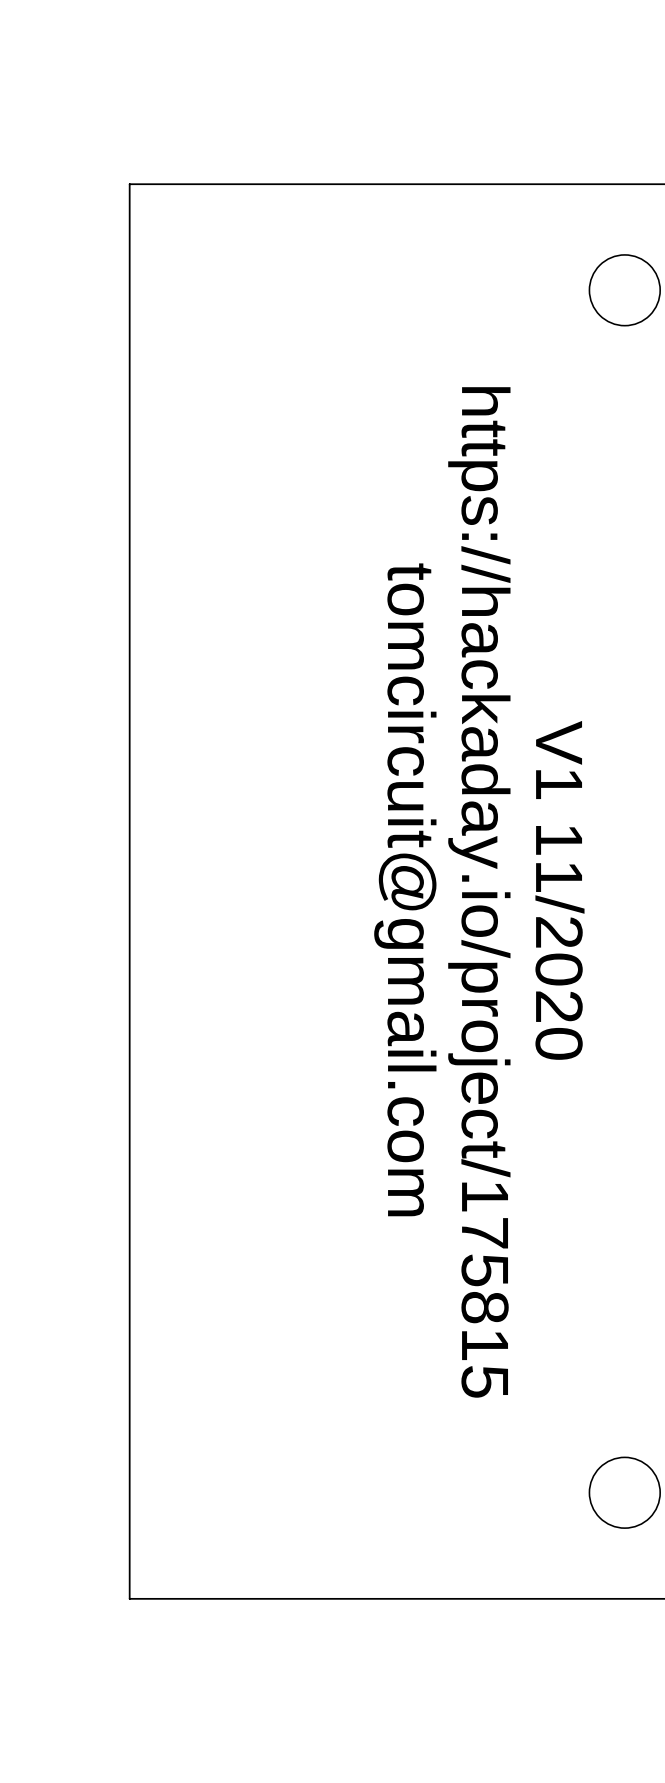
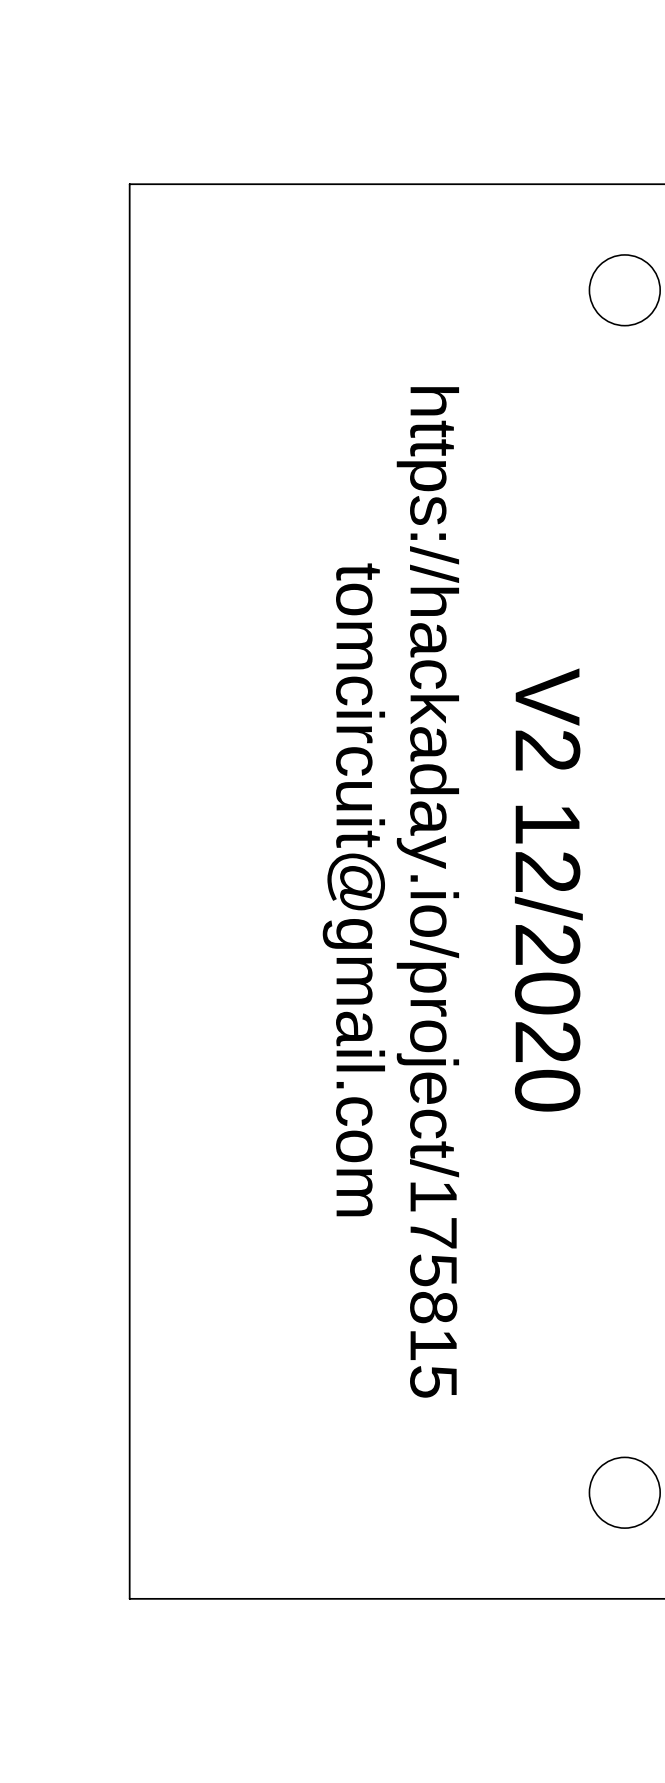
text position: tomcircuit@gmail.com (405, 889) -> tomcircuit@gmail.com (353, 889)
text: V1 11/2020 (559, 890) -> V2 12/2020 (548, 890)
text position: https://hackaday.io/project/175815 (479, 892) -> https://hackaday.io/project/175815 (427, 892)

